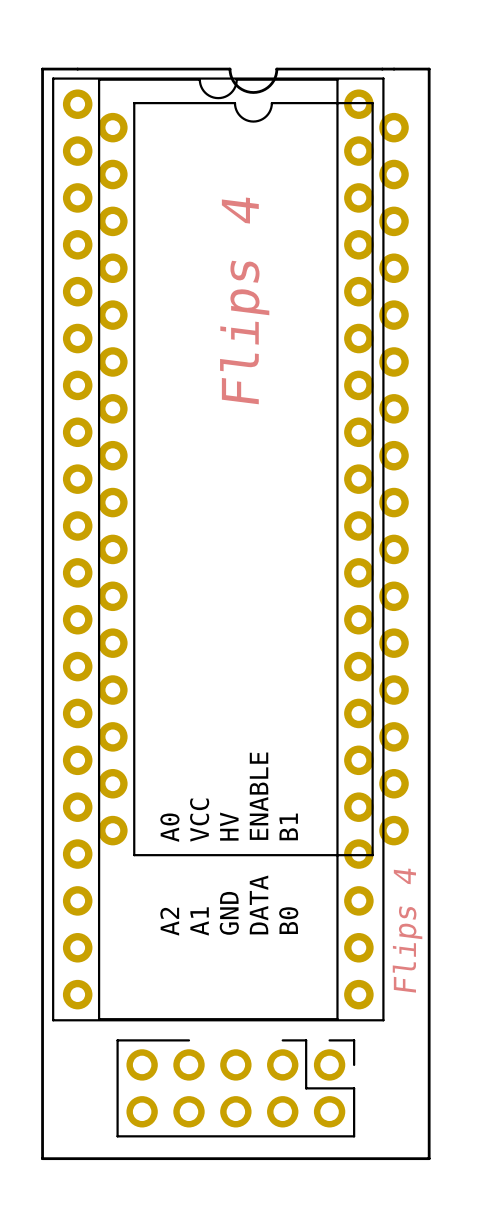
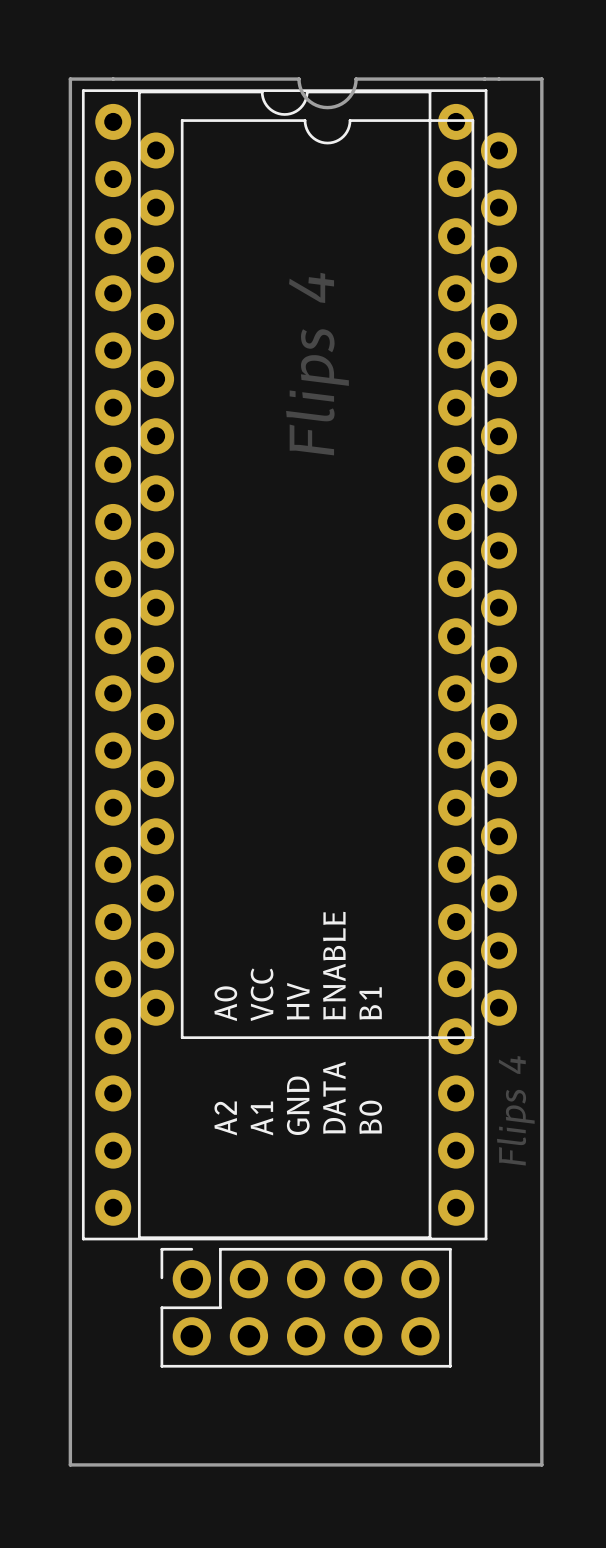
part footprint: [116, 1039, 356, 1138] -> [160, 1247, 452, 1368]
board edge: (42, 1158) (429, 1158) -> (70, 1407) (70, 1464) (541, 1464) (541, 1407)

